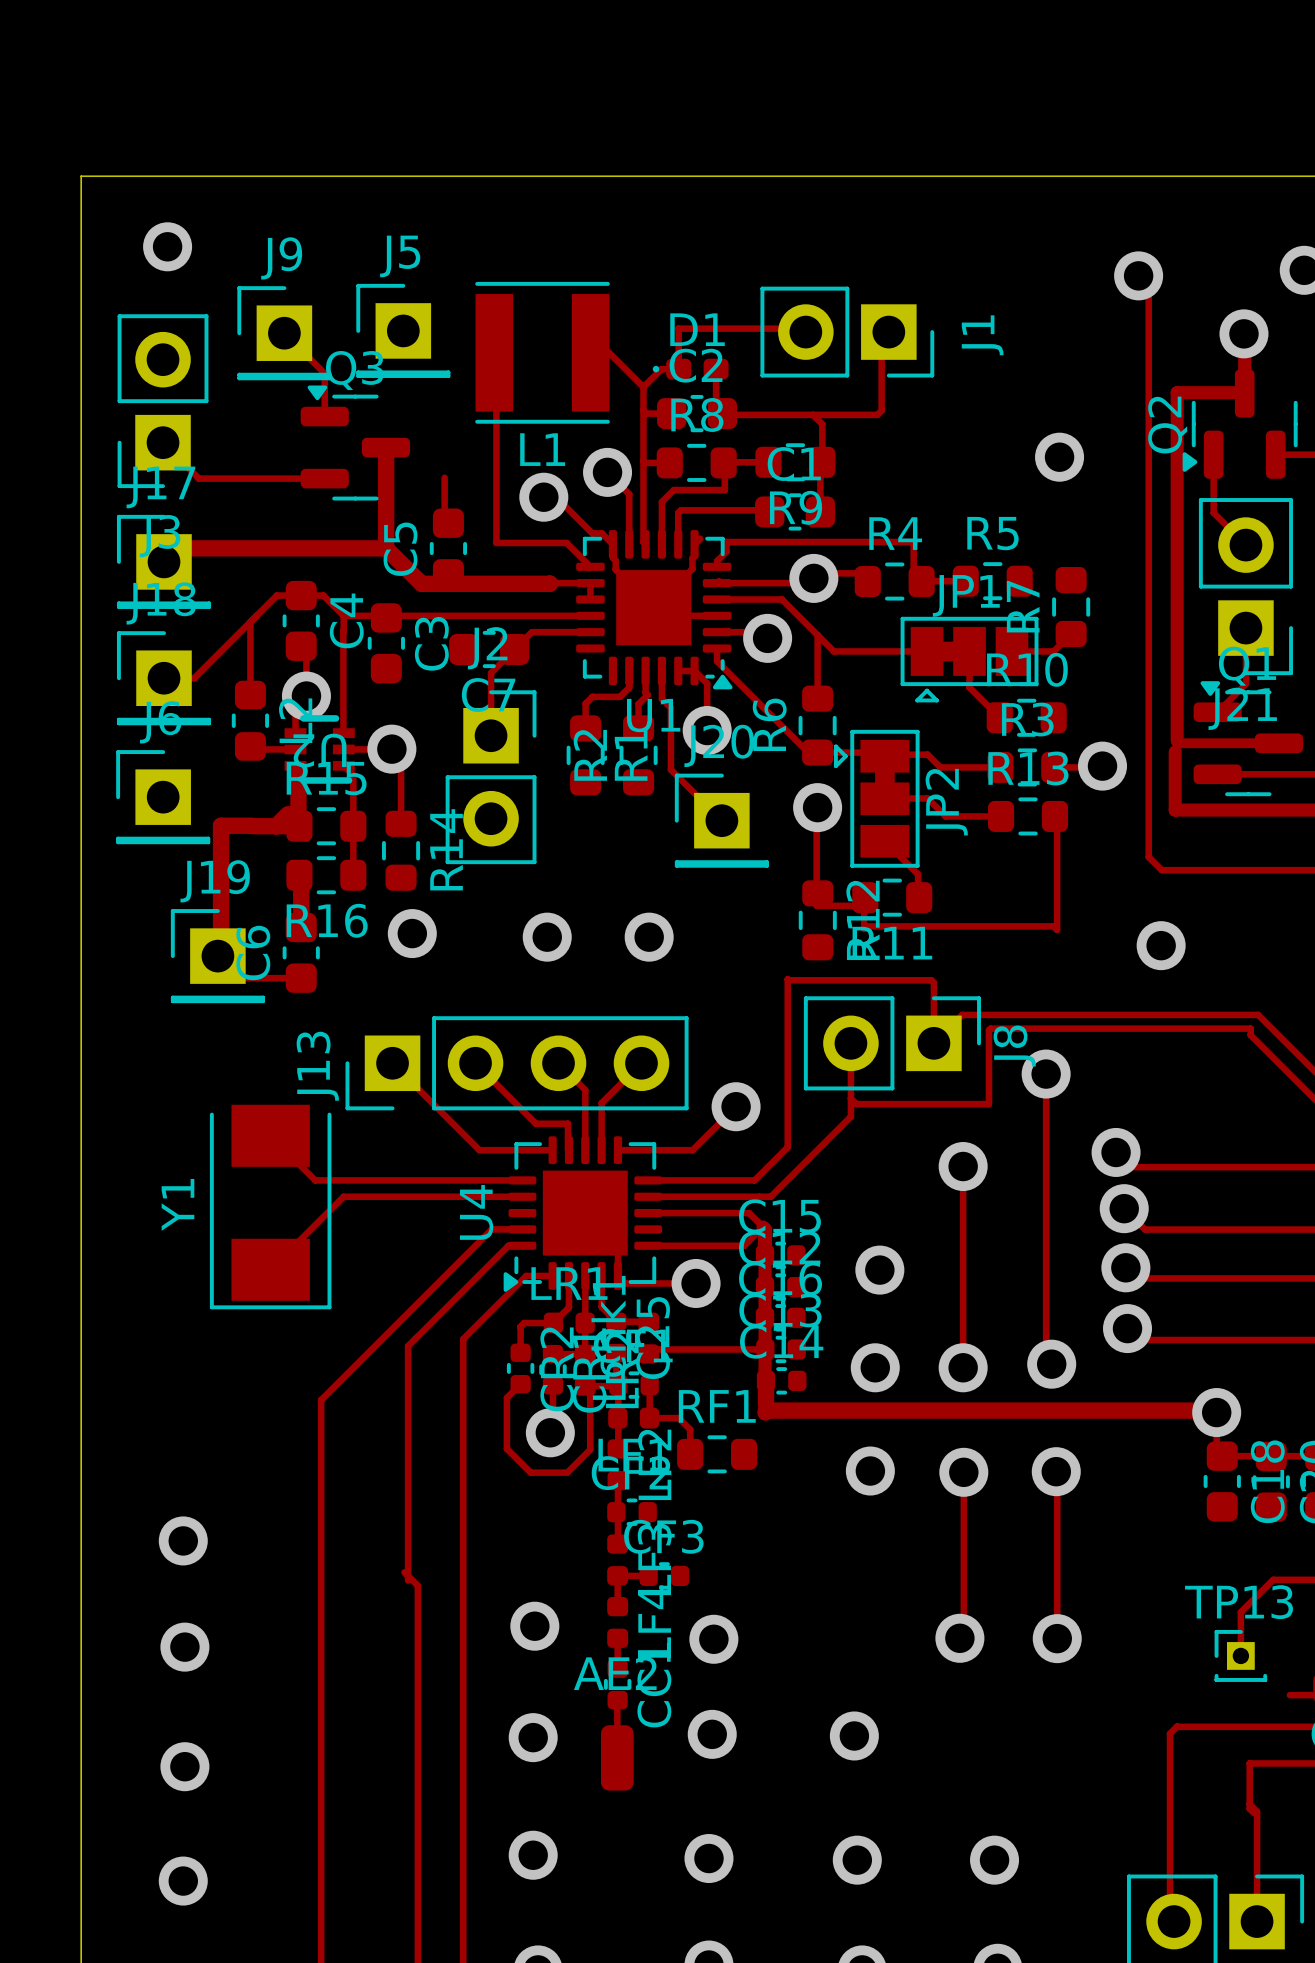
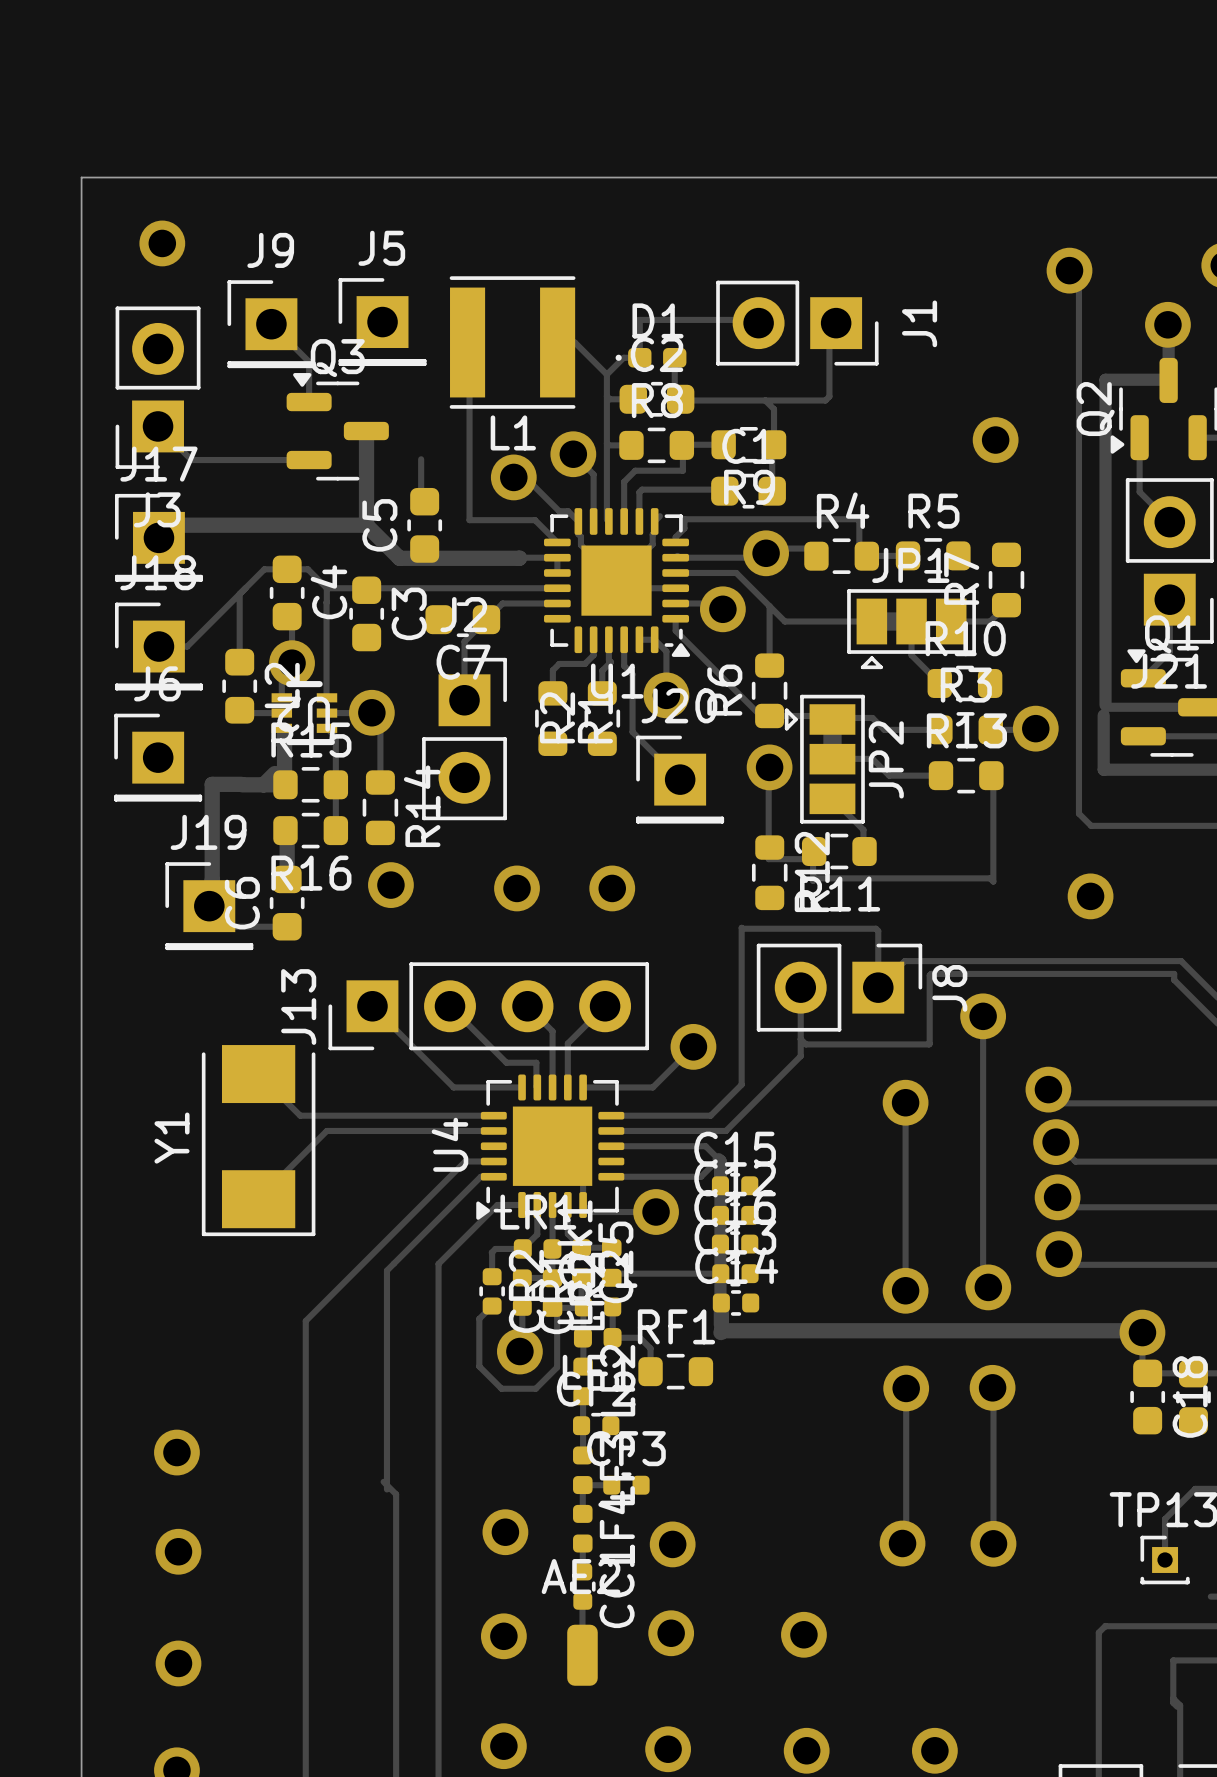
via: (879, 1270) -> none
via: (875, 1367) -> none
via: (870, 1471) -> none

